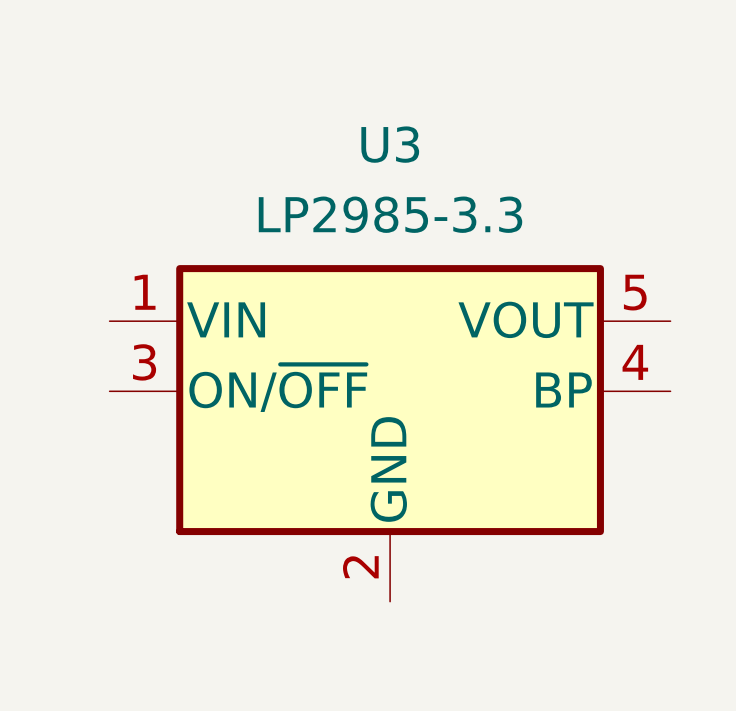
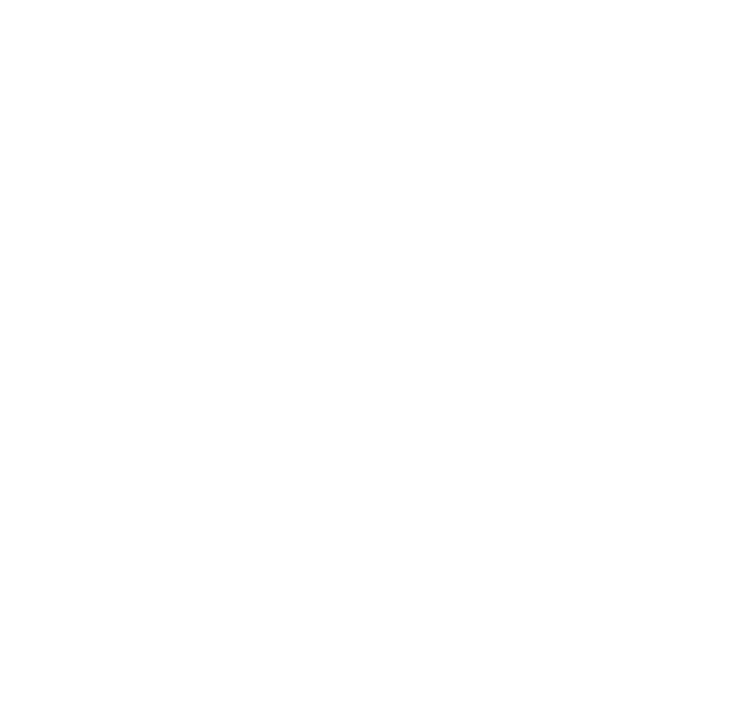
U3: LP2985-3.3 (390, 433) -> none

